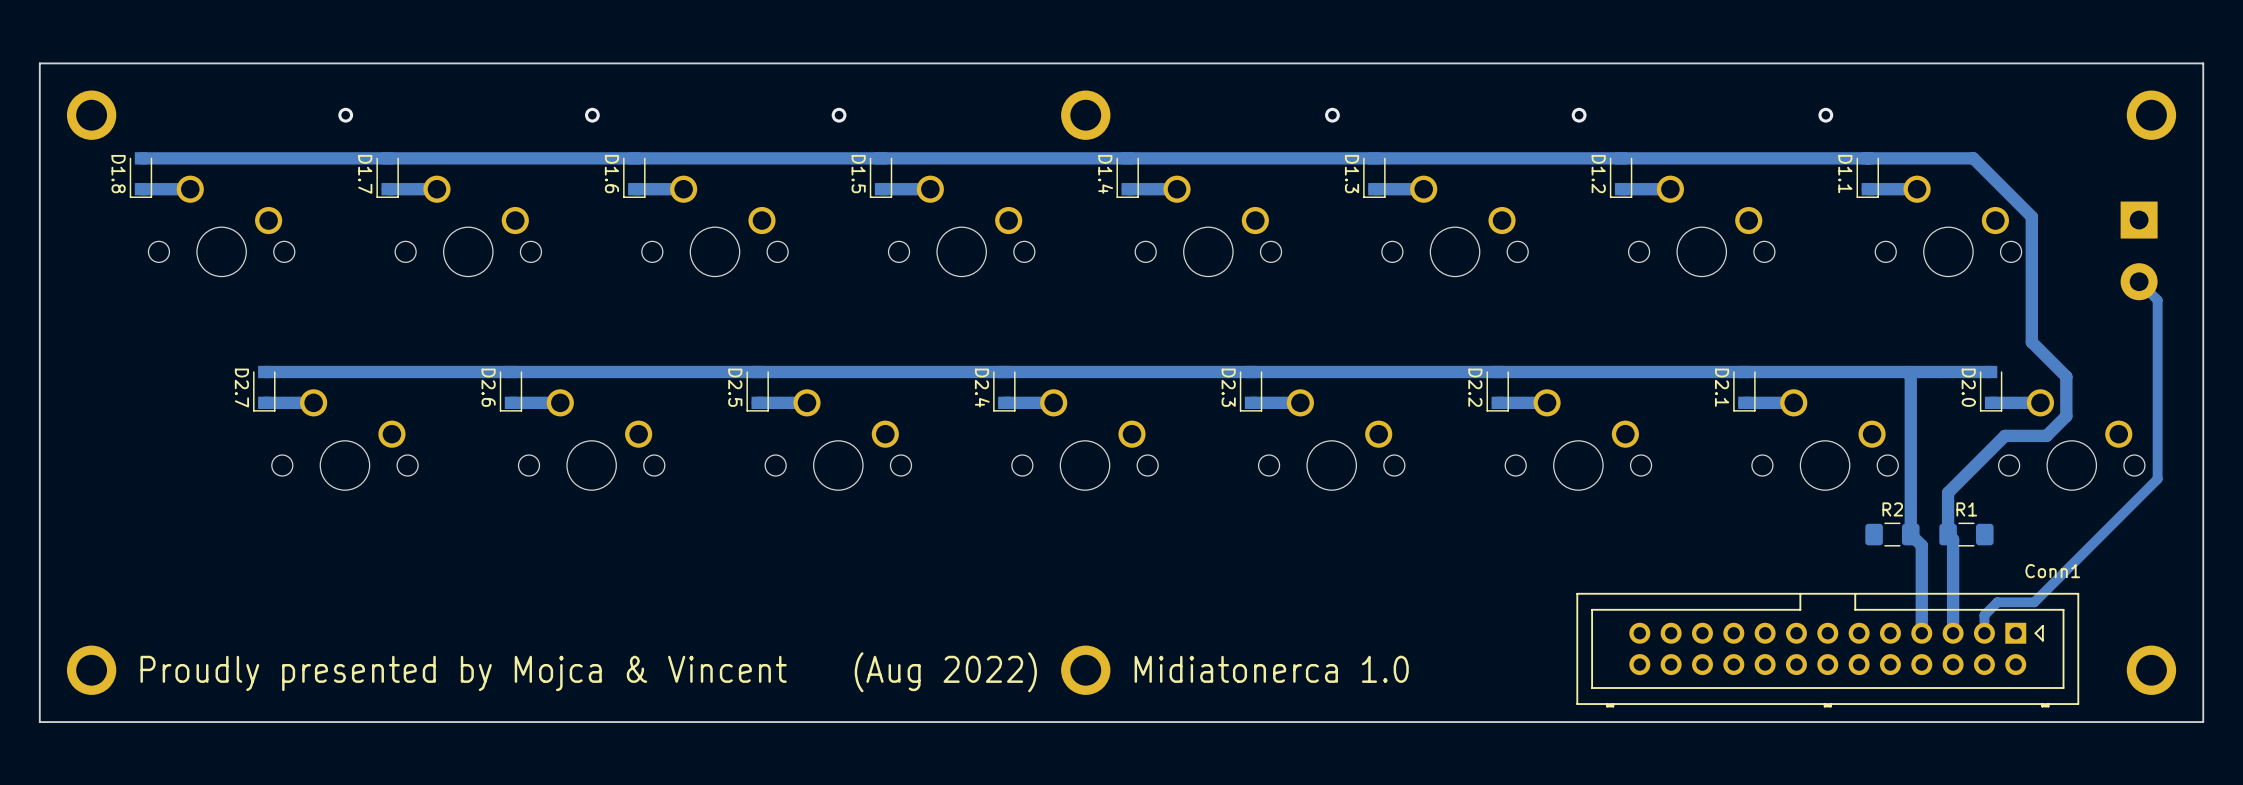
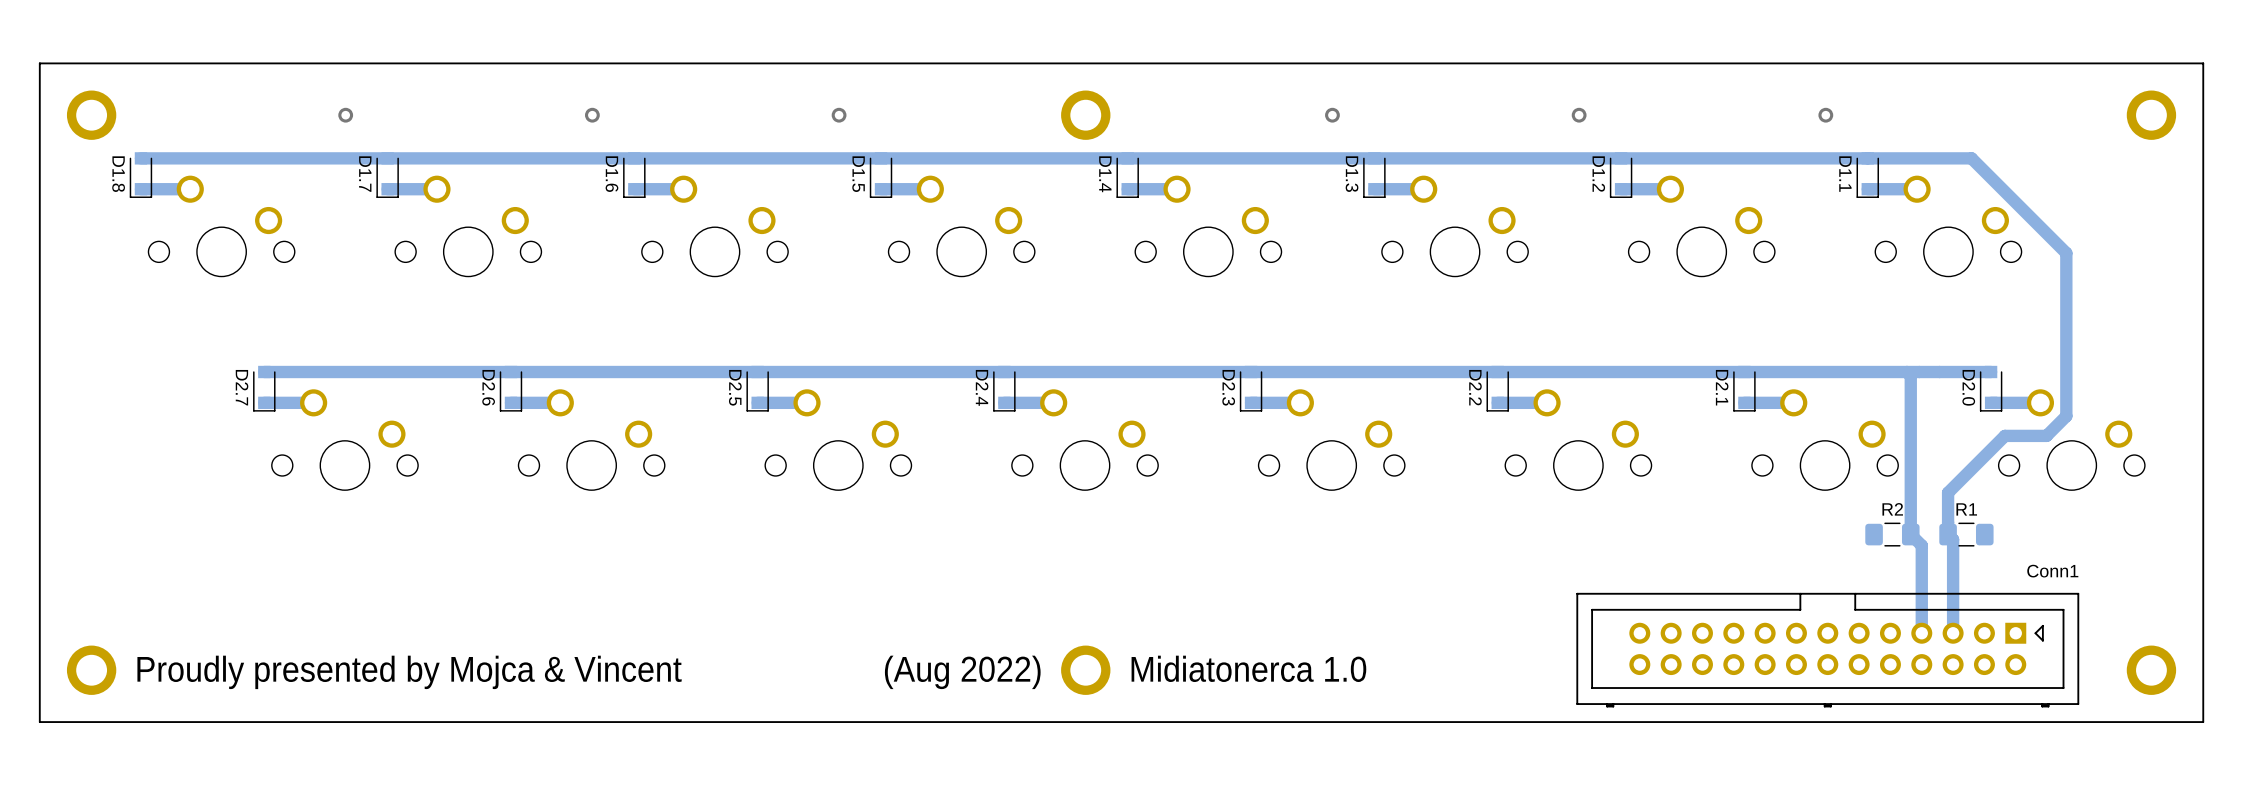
track: (1971, 158) (2031, 216) (2031, 342) (2066, 376) -> (1971, 158) (2066, 253) (2066, 376)
part: (2139, 250) -> none
track: (2139, 281) (2157, 300) (2157, 479) (2034, 602) (1997, 602) (1984, 615) (1984, 633) -> none

